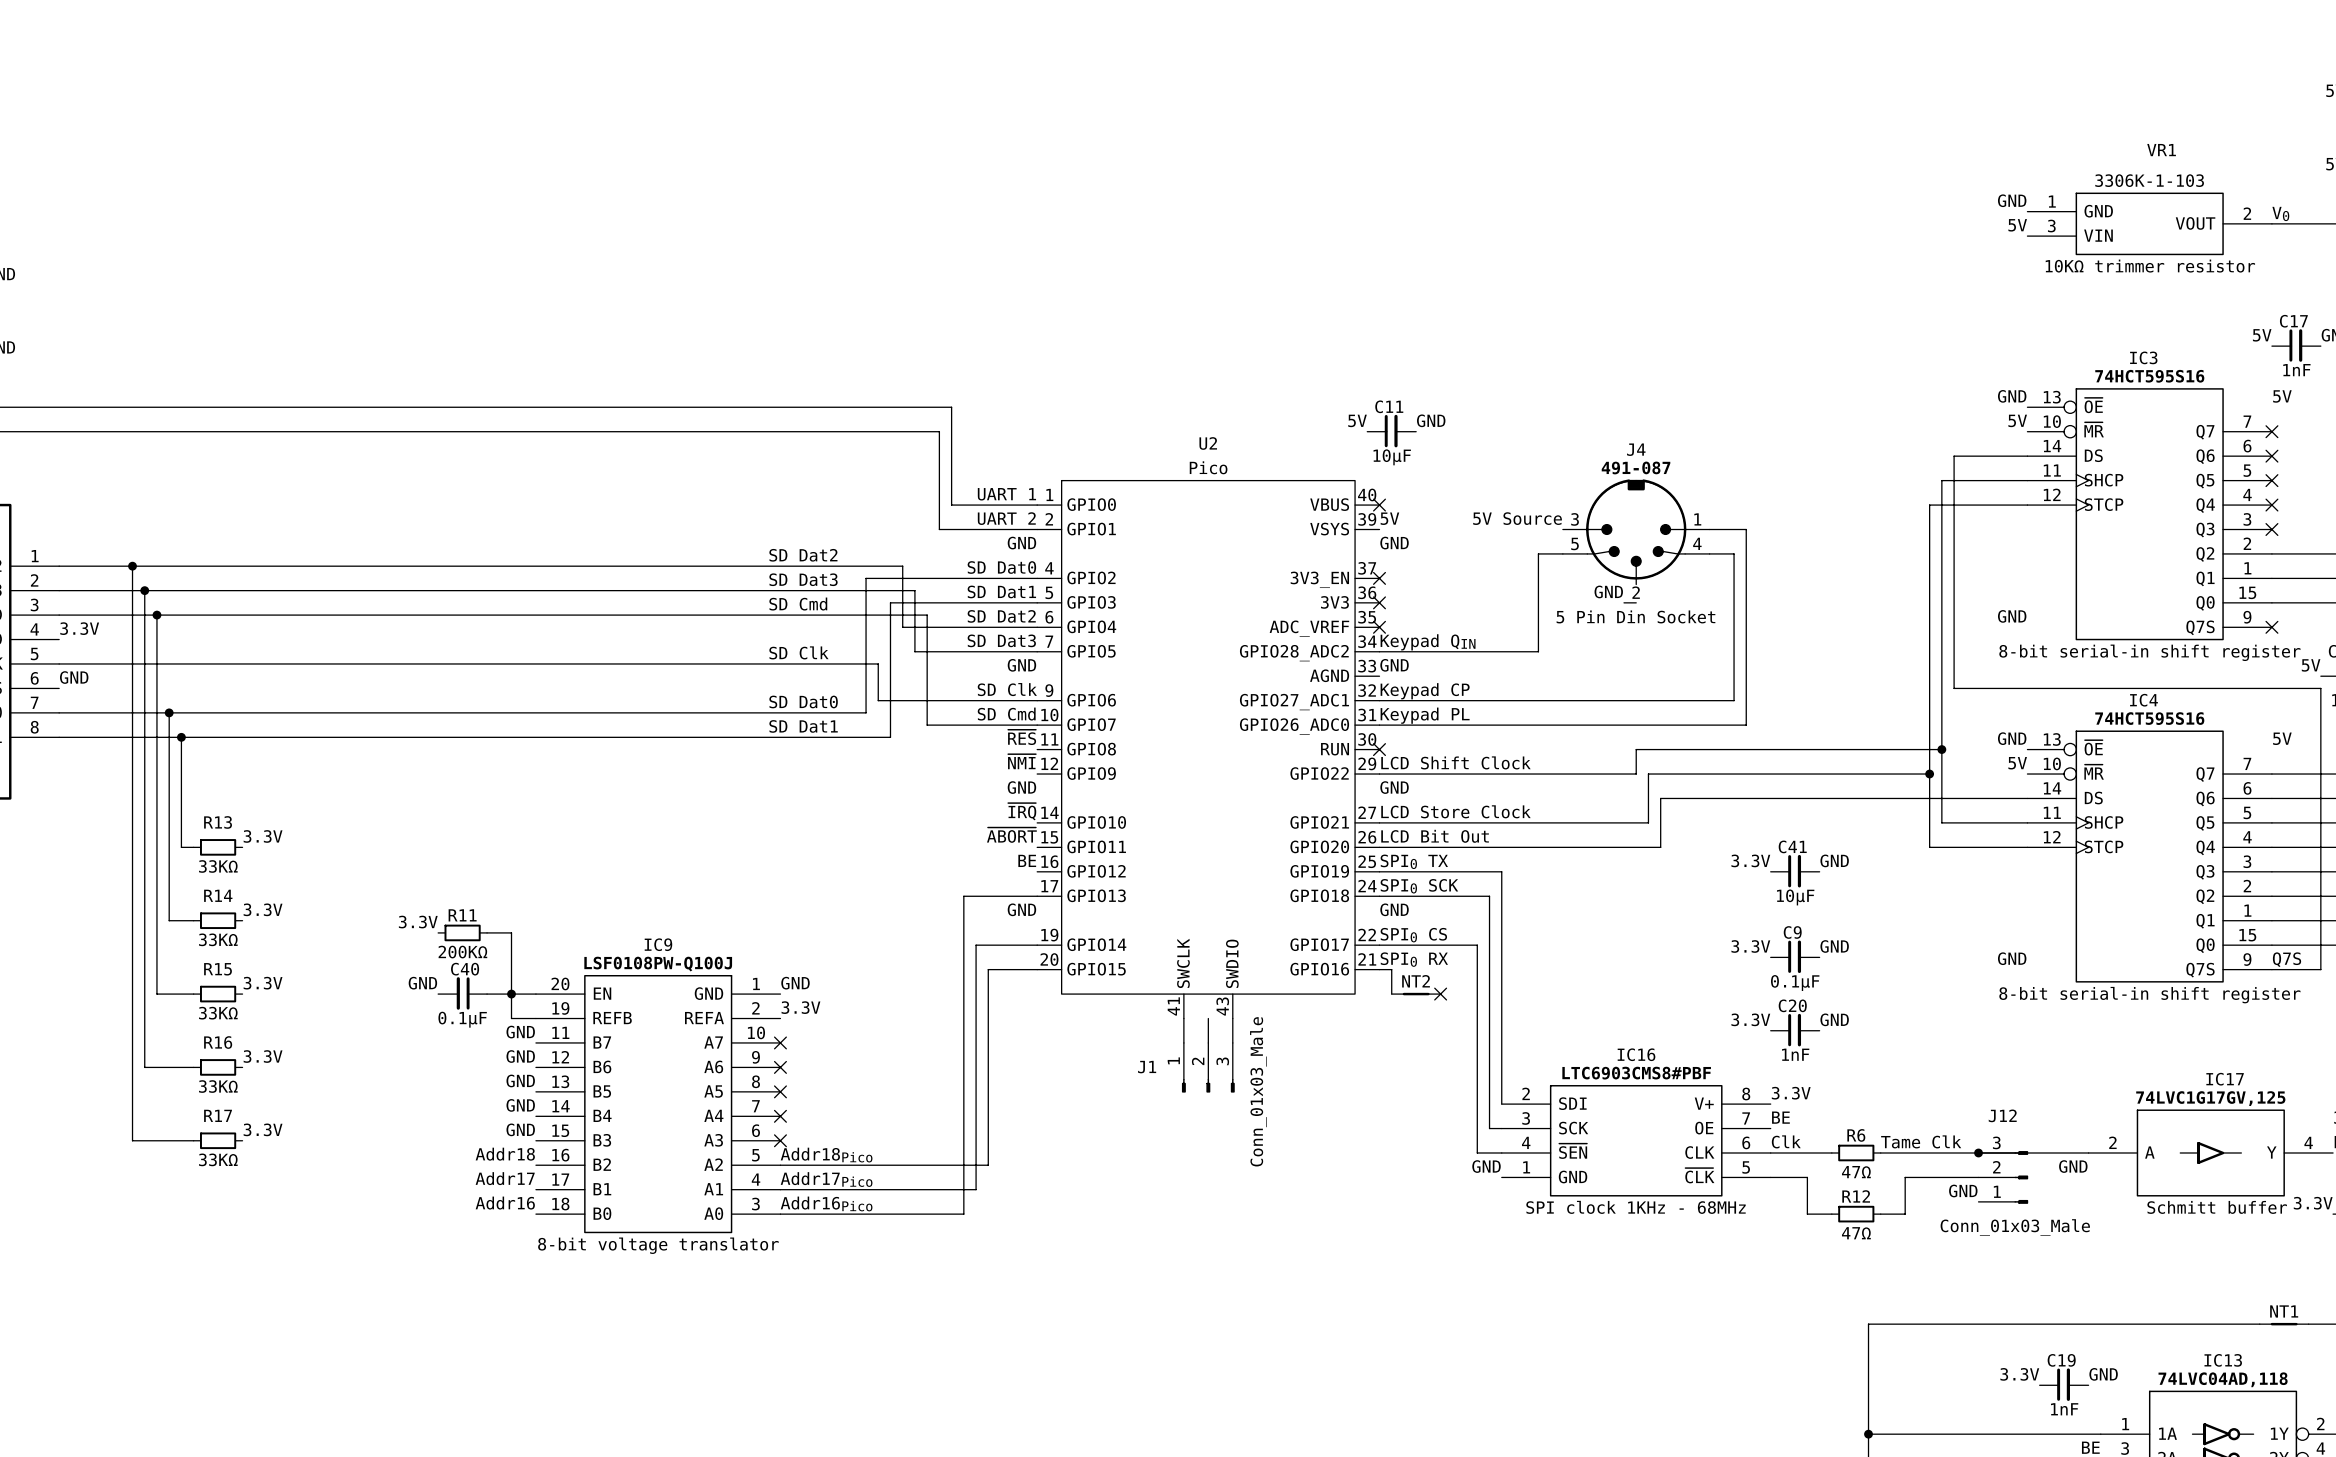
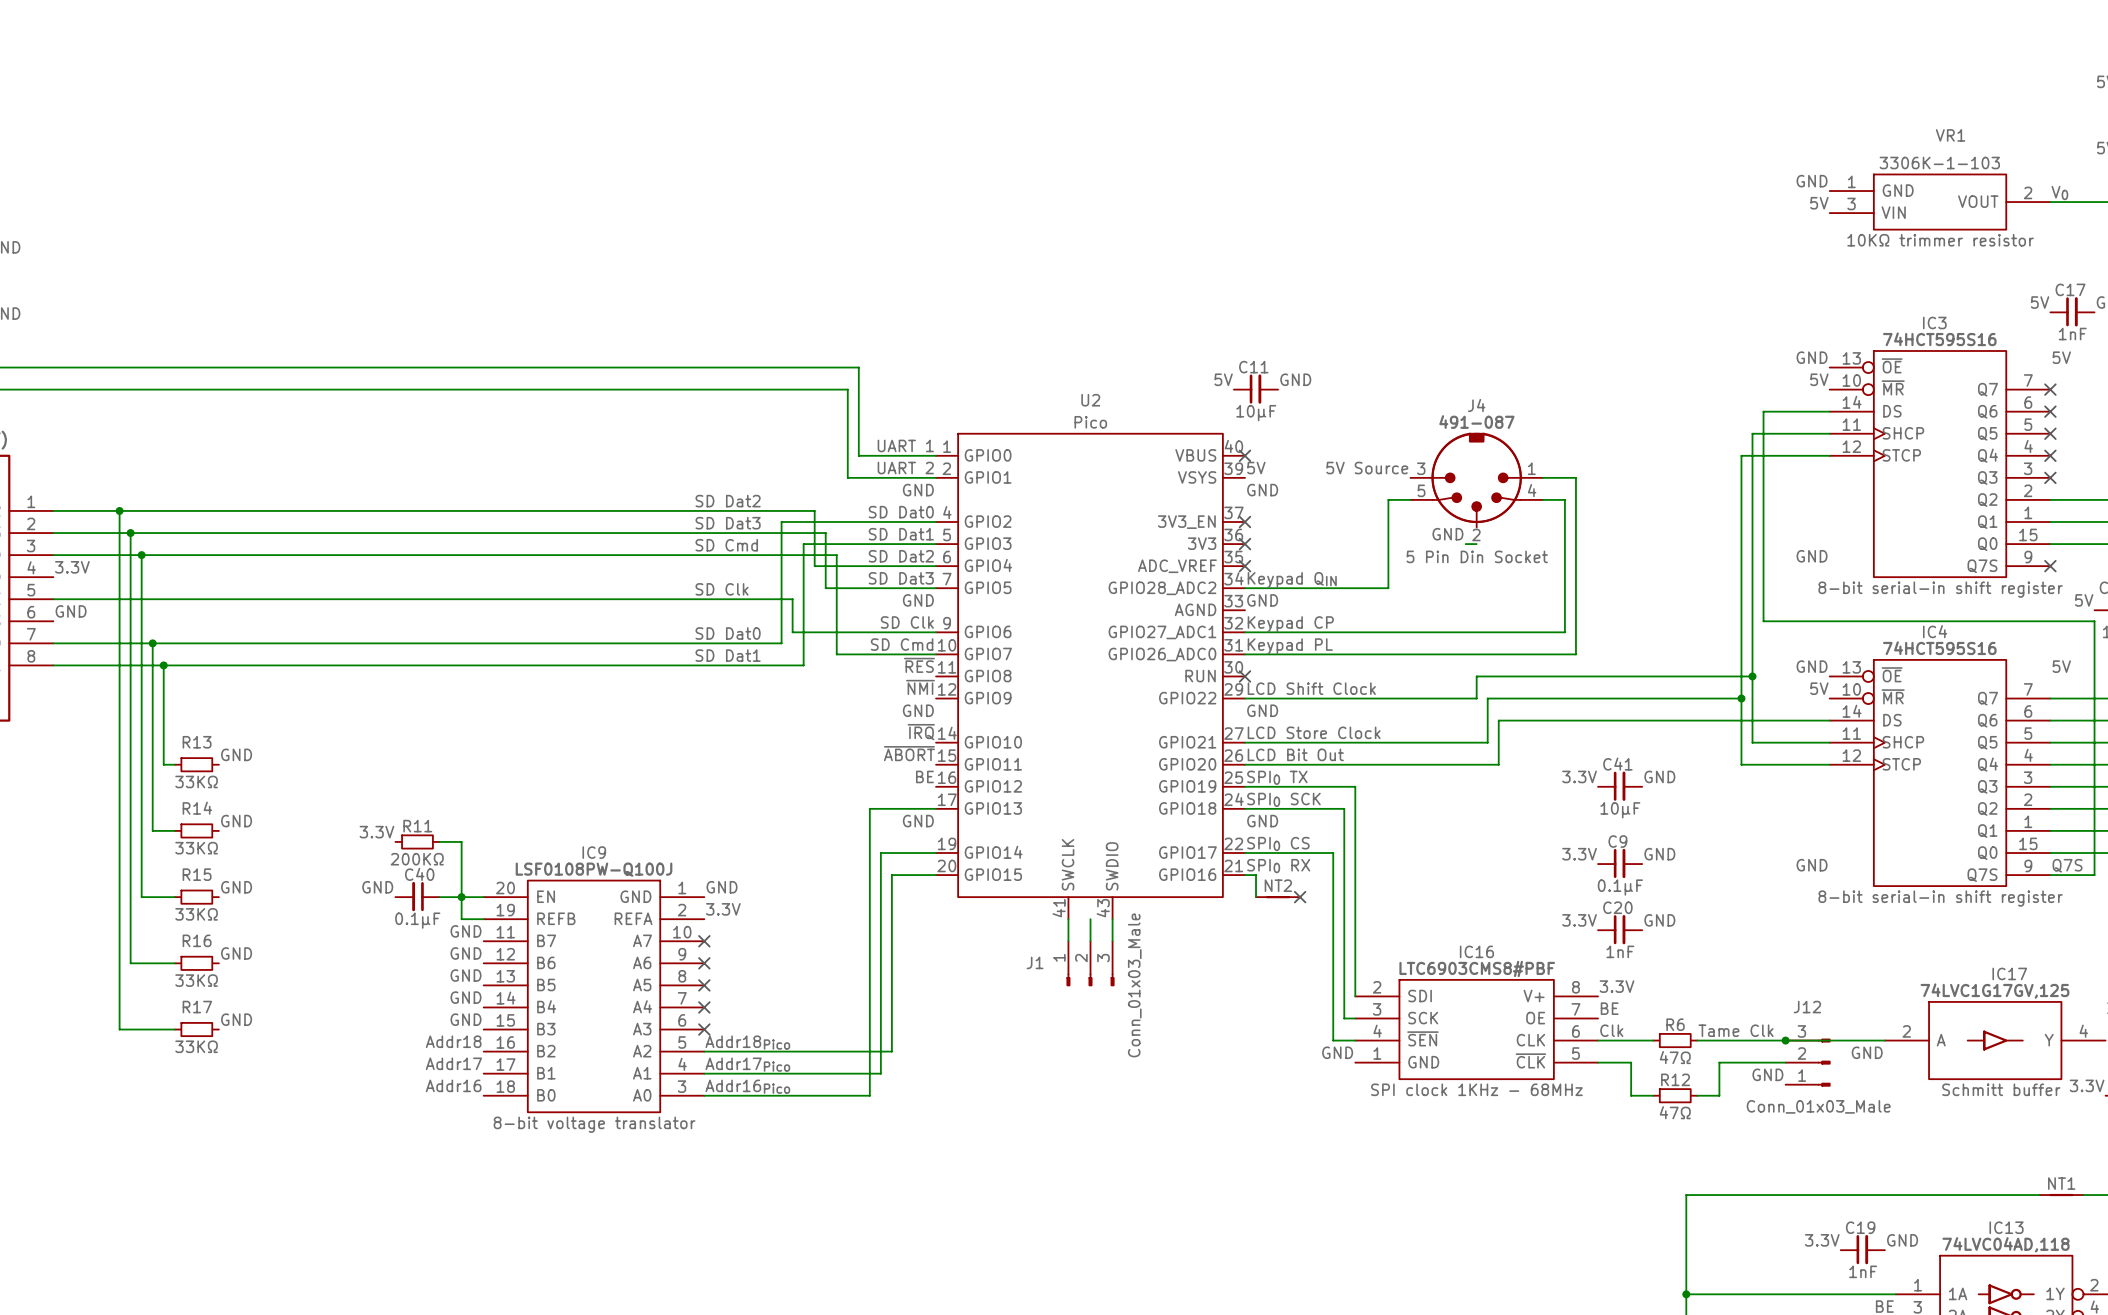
label: 3.3V (263, 836) -> GND (236, 754)
label: 3.3V (263, 909) -> GND (236, 821)
label: 3.3V (263, 983) -> GND (236, 887)
label: 3.3V (263, 1056) -> GND (236, 953)
label: 3.3V (263, 1129) -> GND (236, 1019)

